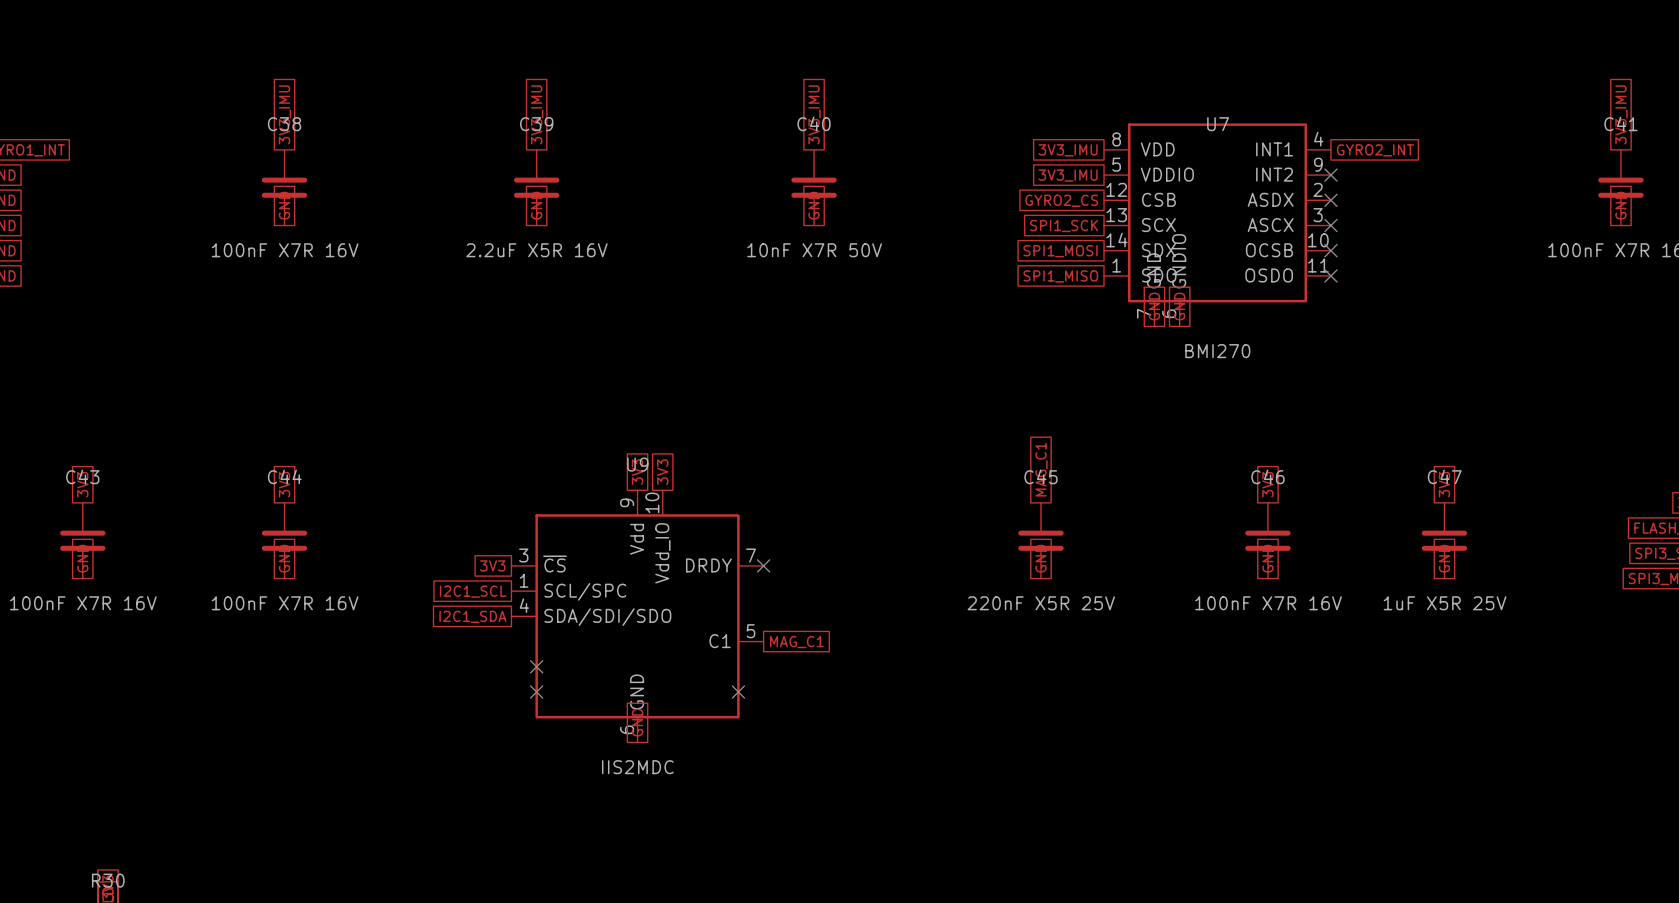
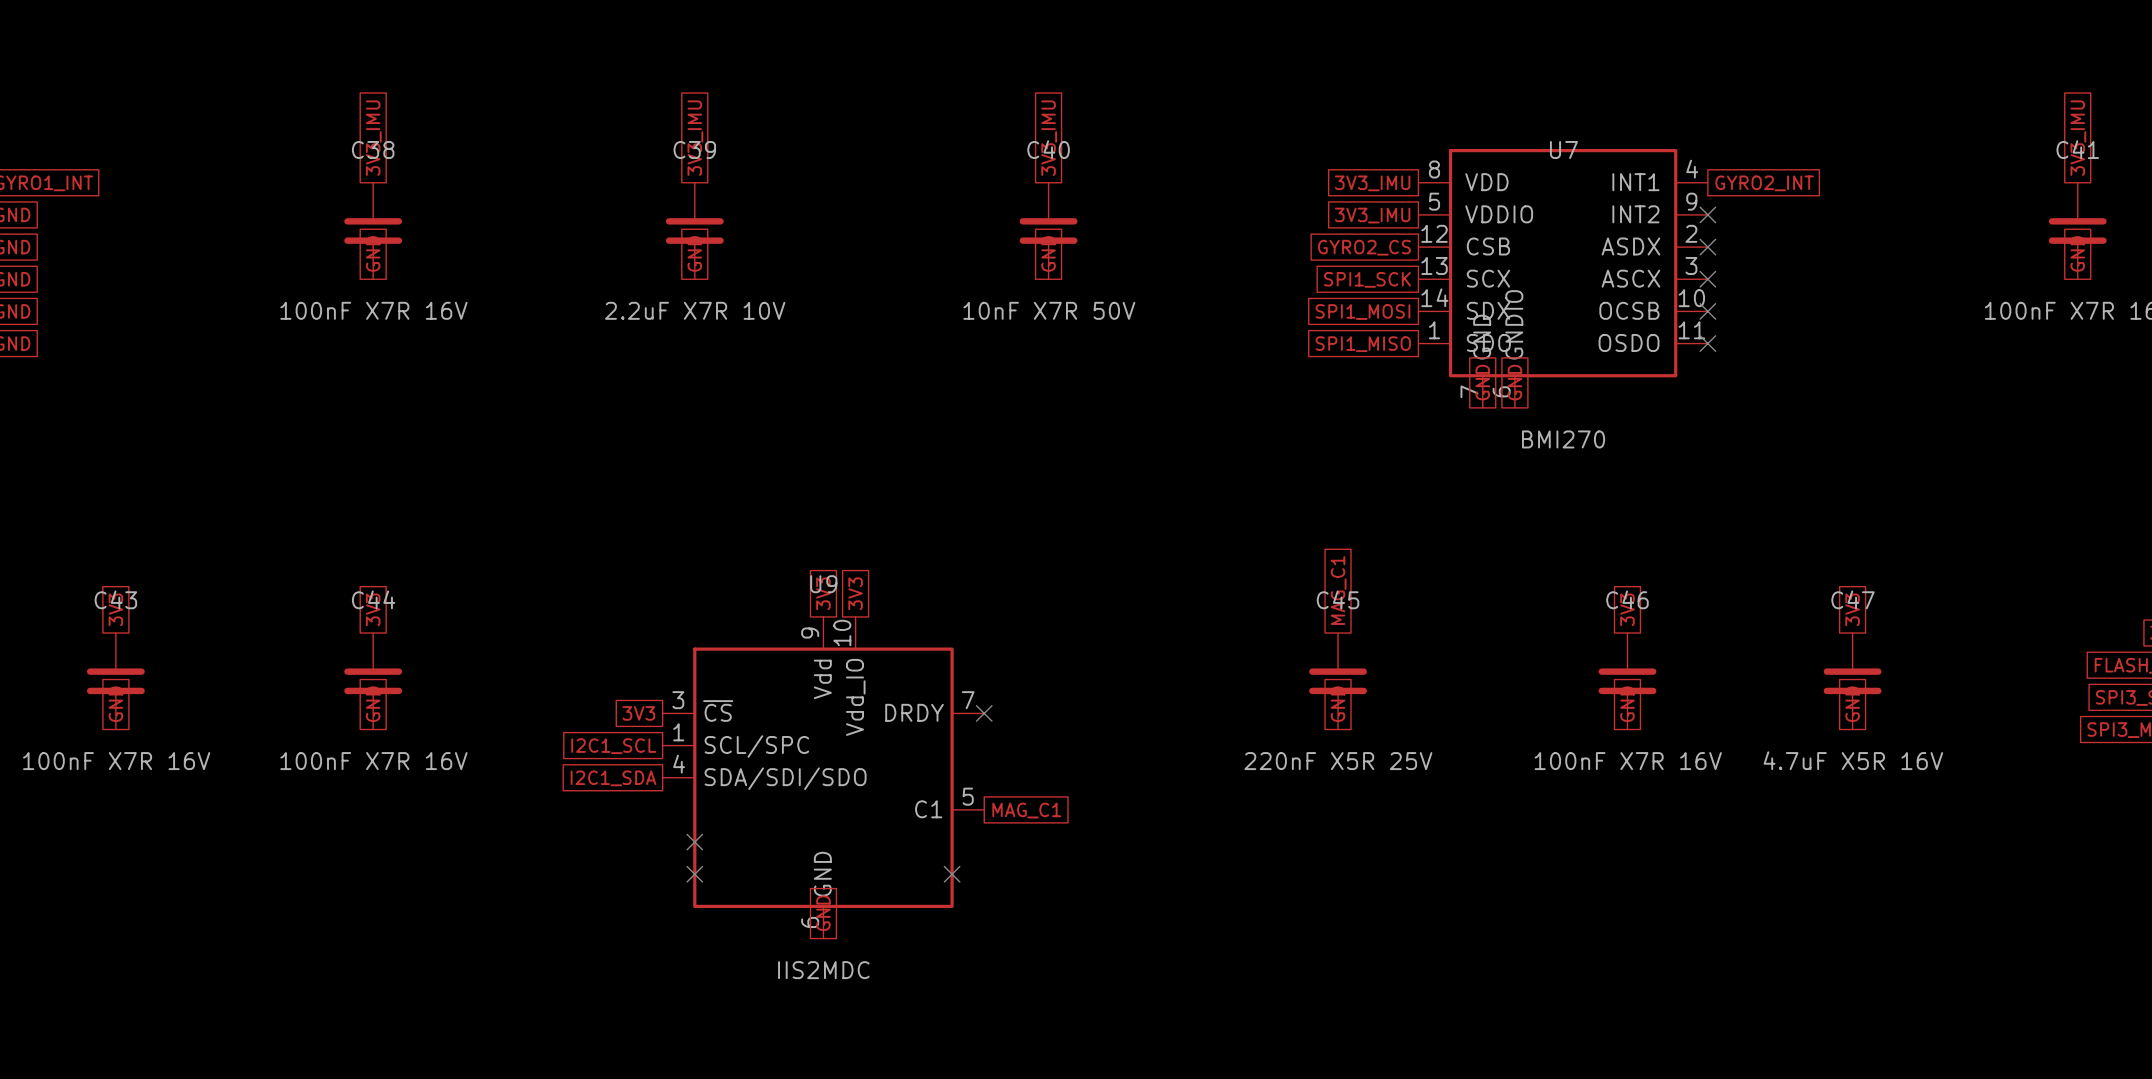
C39 value: 2.2uF X5R 16V (536, 250) -> 2.2uF X7R 10V (695, 310)
C47 value: 1uF X5R 25V (1445, 603) -> 4.7uF X5R 16V (1853, 760)

